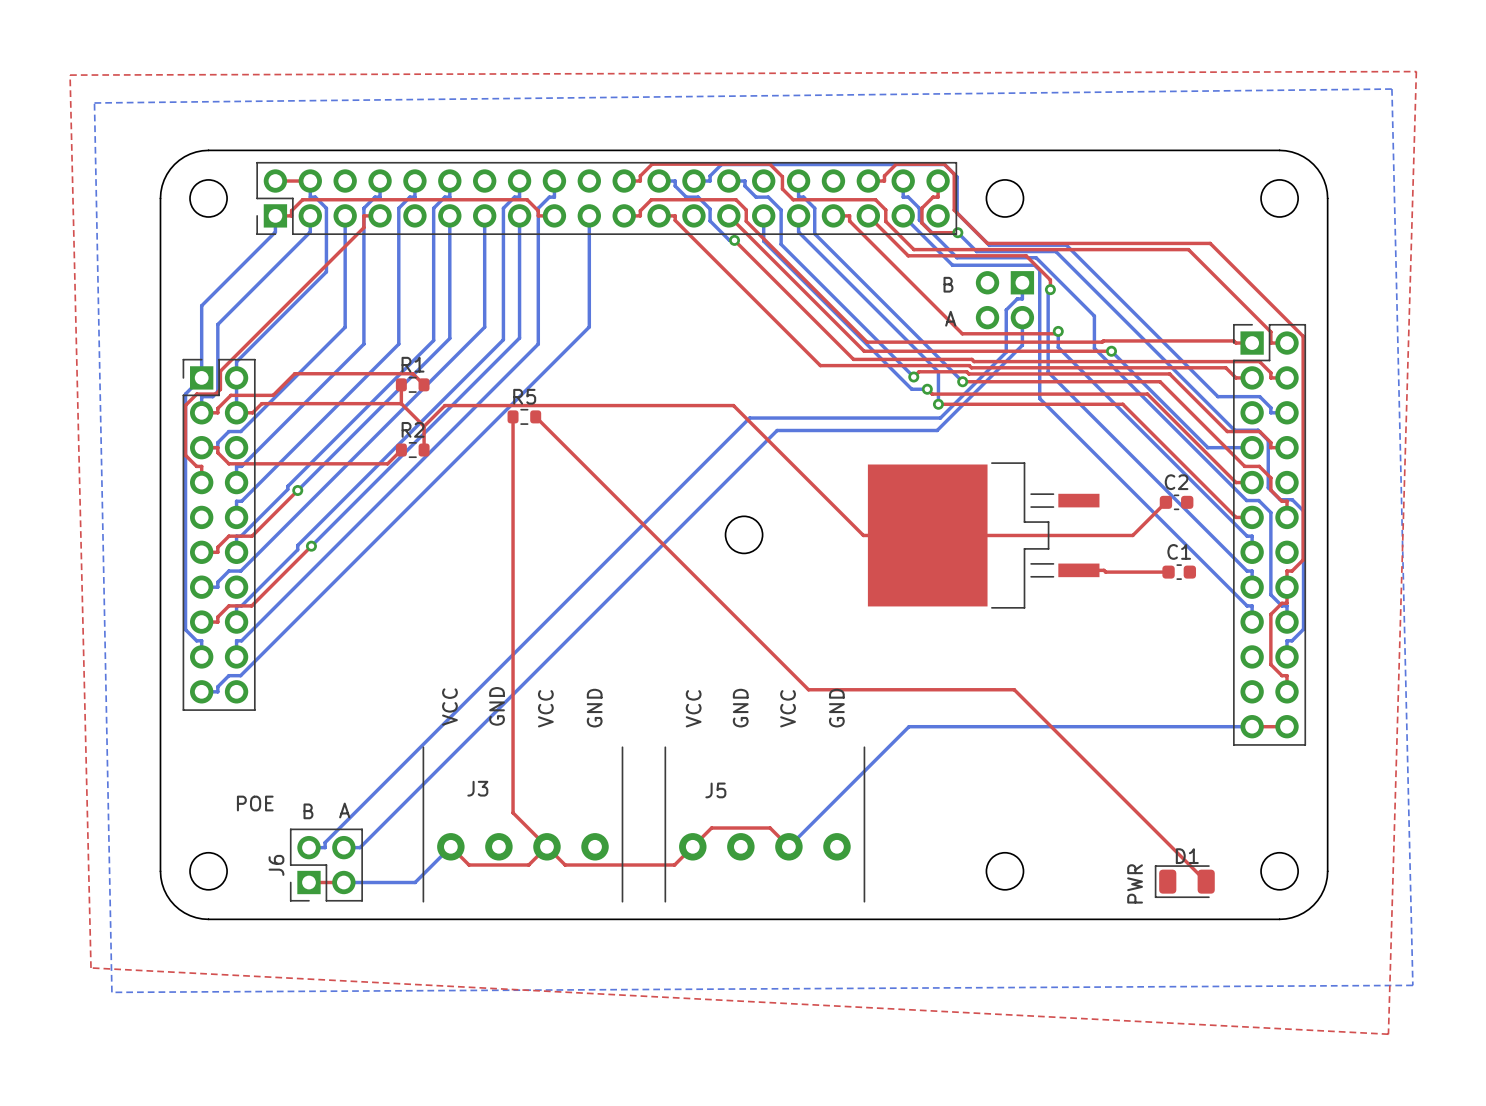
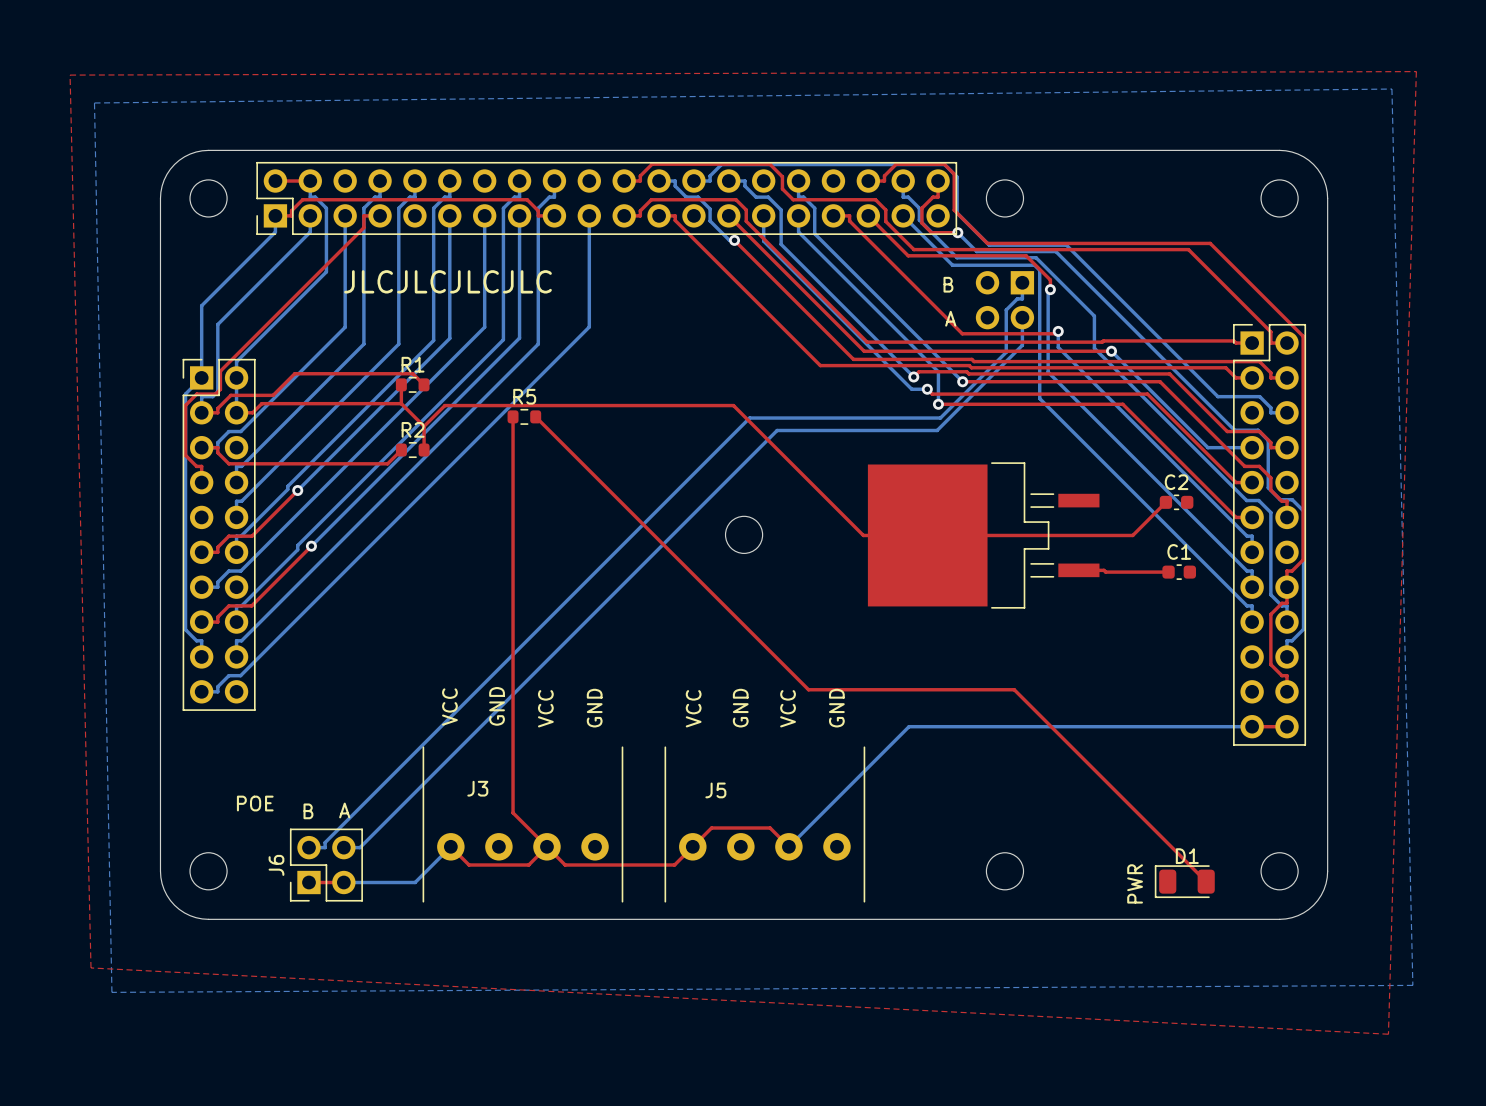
text: none -> JLCJLCJLCJLC (448, 281)

